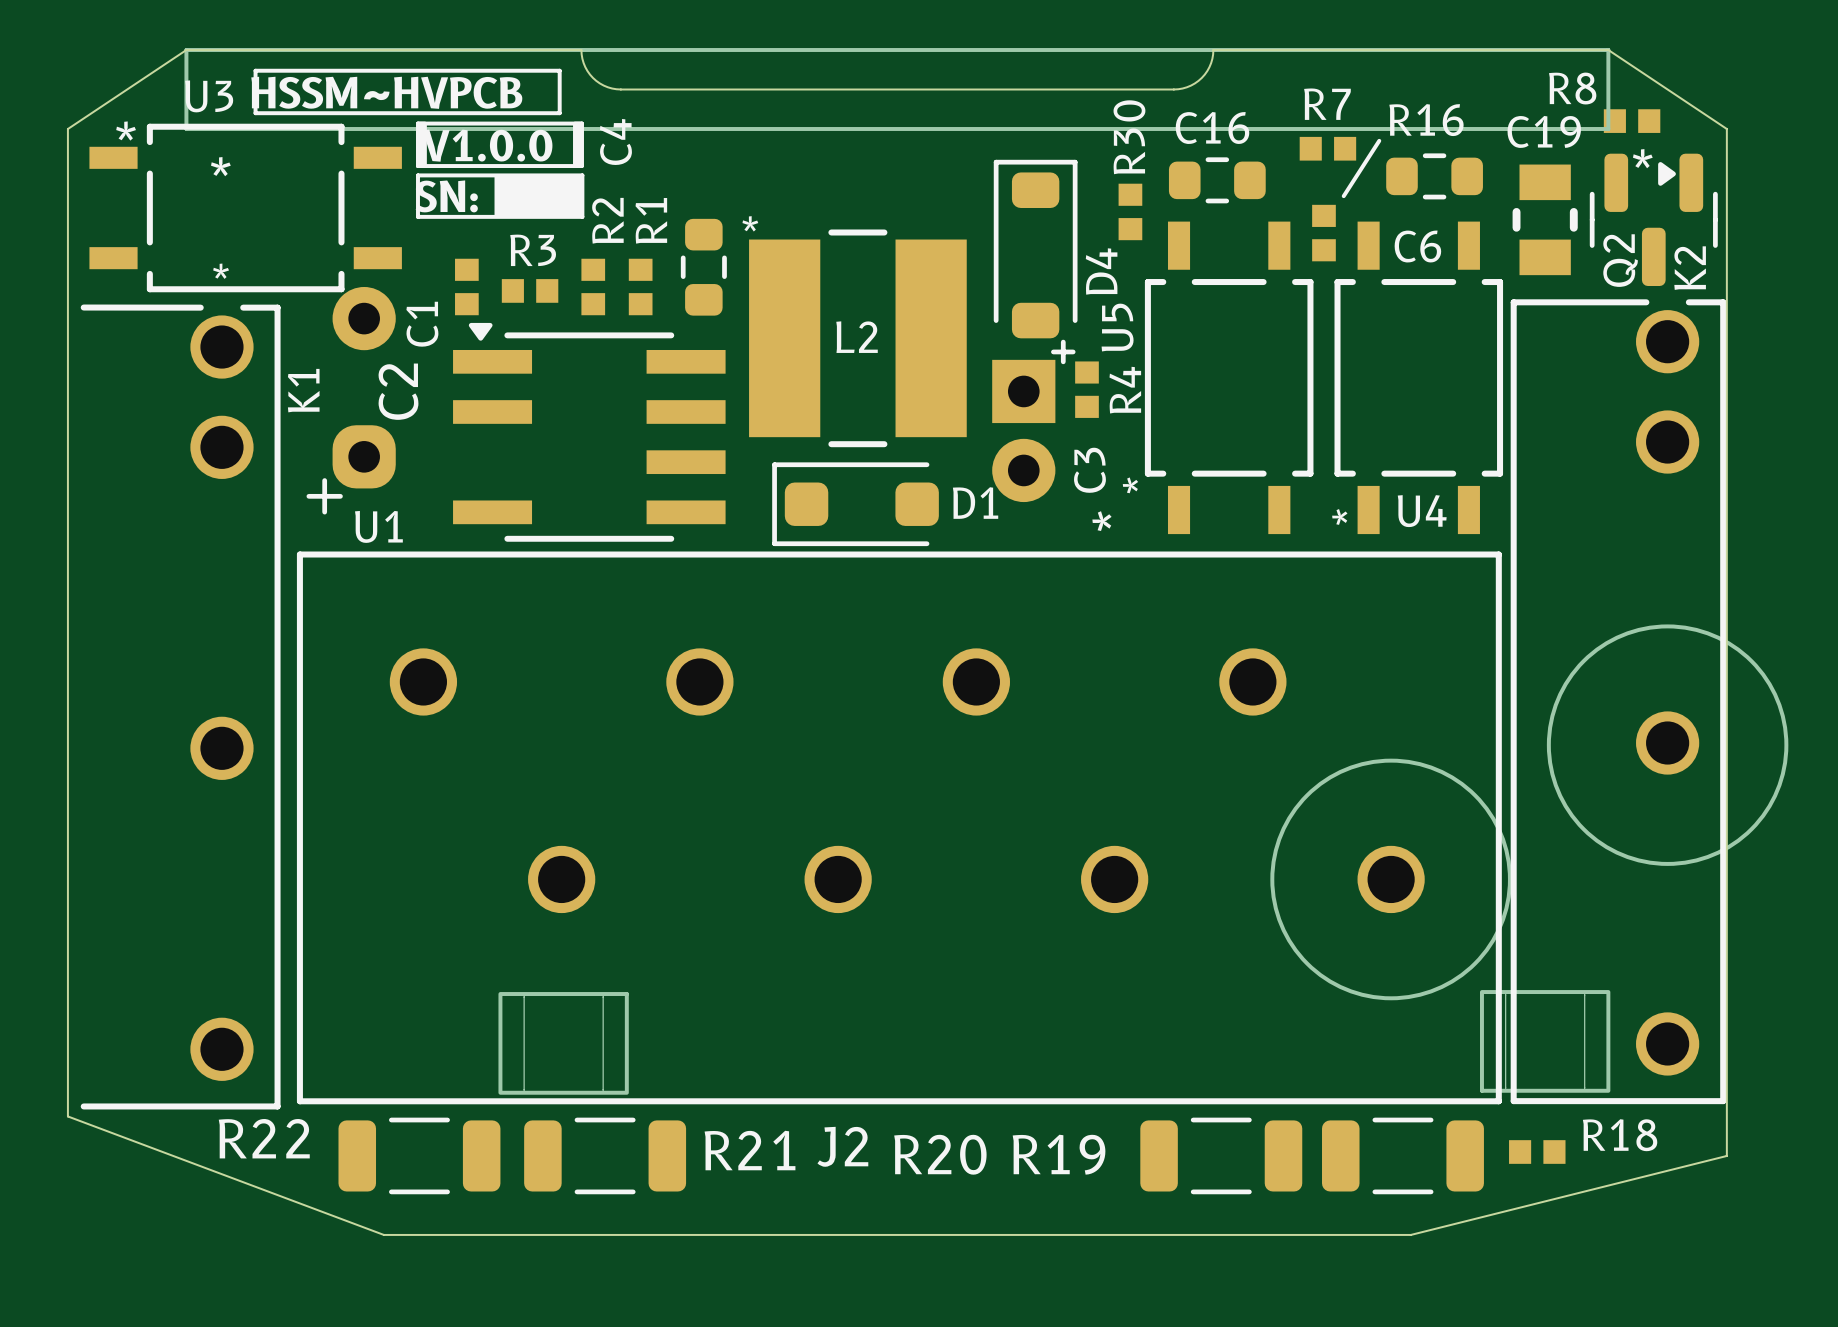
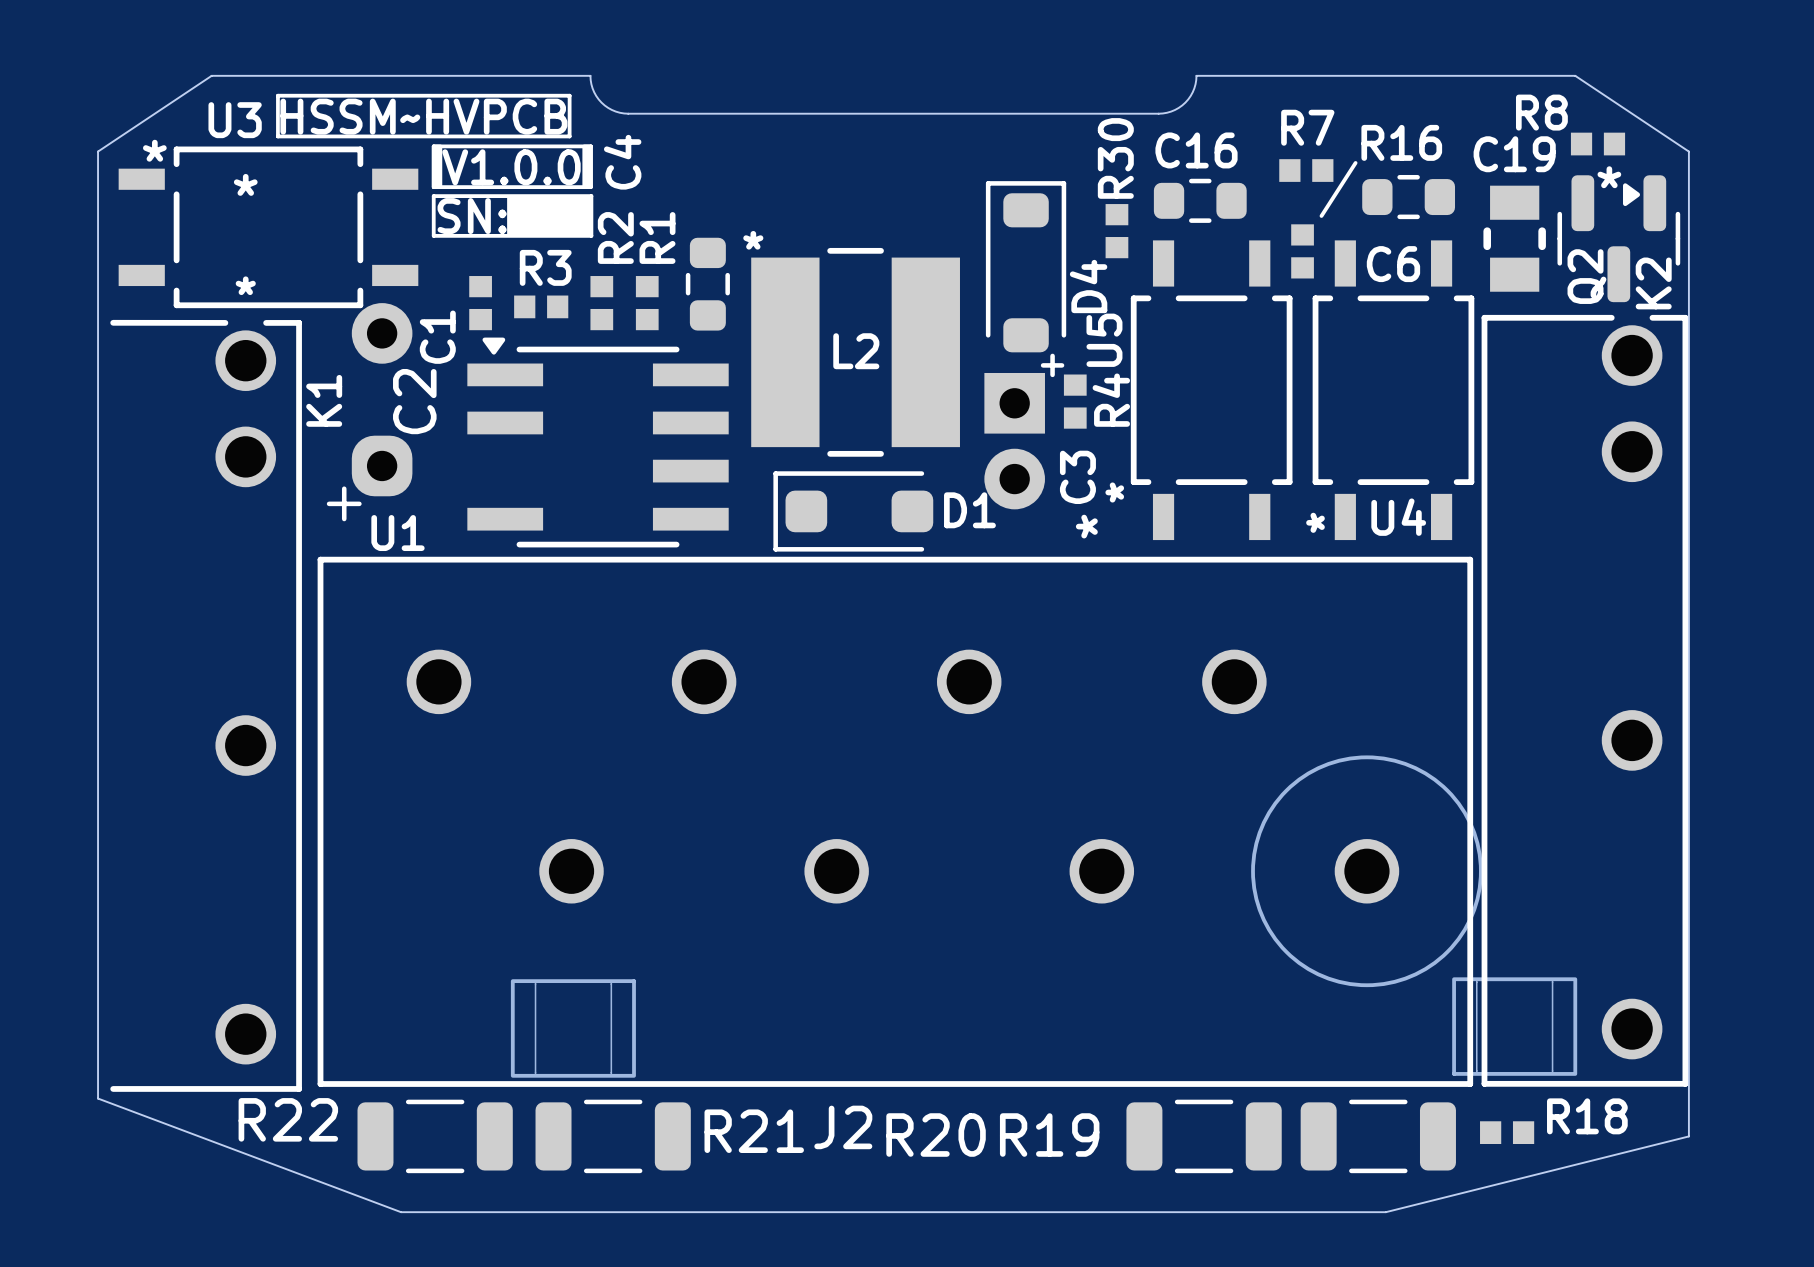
line: (186, 50) (1608, 50) (1608, 128) (186, 128) (186, 50) -> none
drawing: [1546, 624, 1789, 866] -> none

